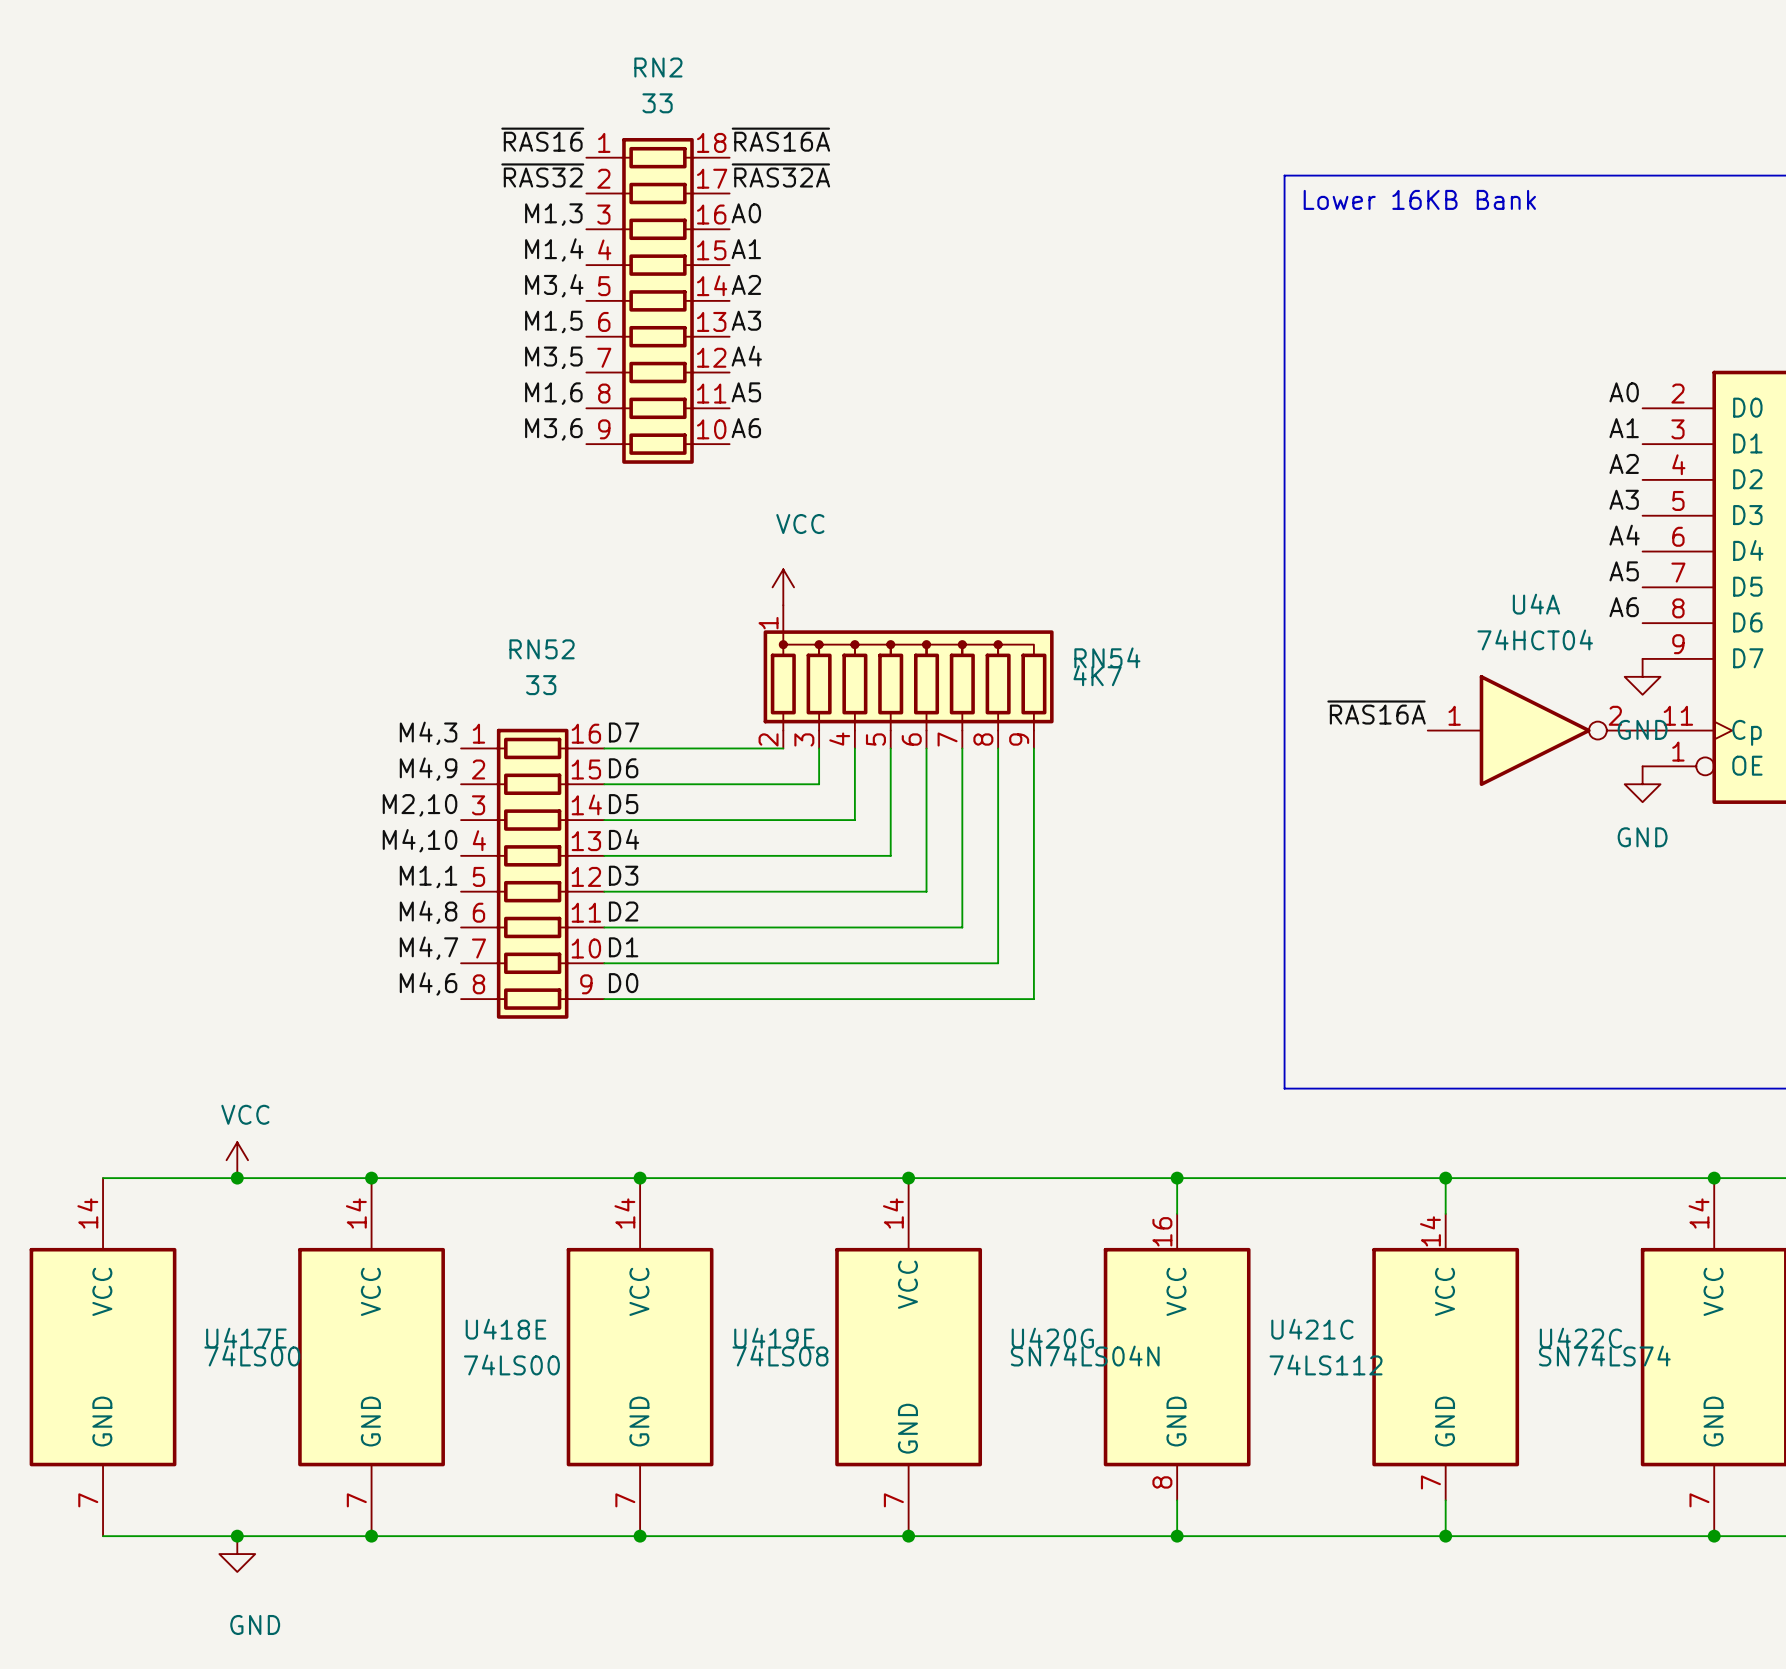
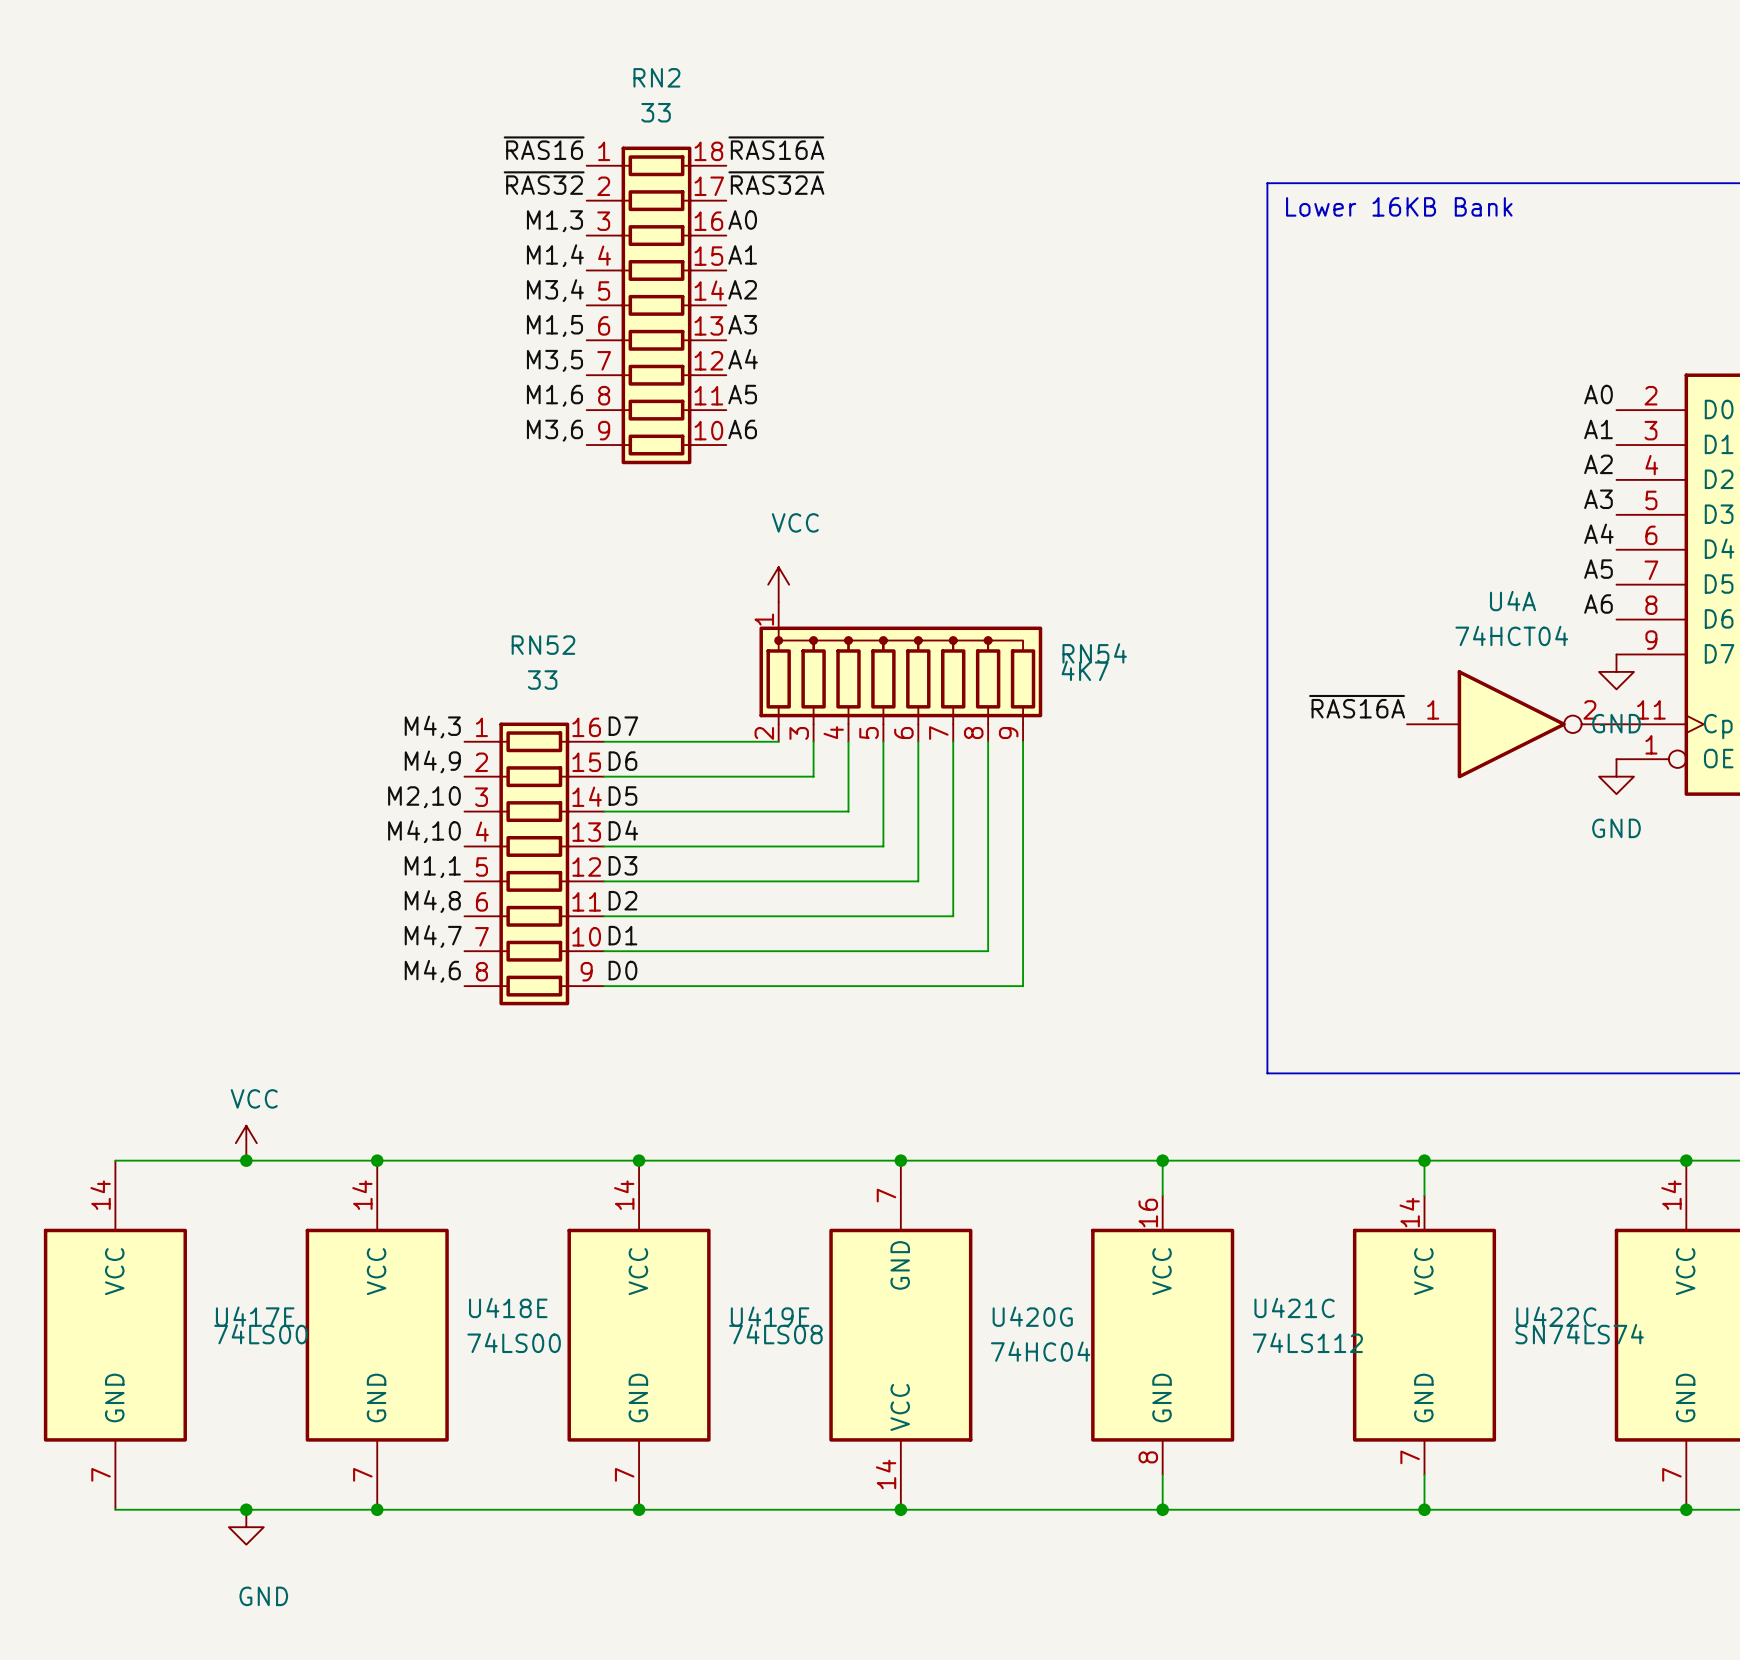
U420G value: SN74LS04N (1085, 1356) -> 74HC04 (1040, 1351)
U420G rotation: 0° (908, 1357) -> 180° (900, 1335)

